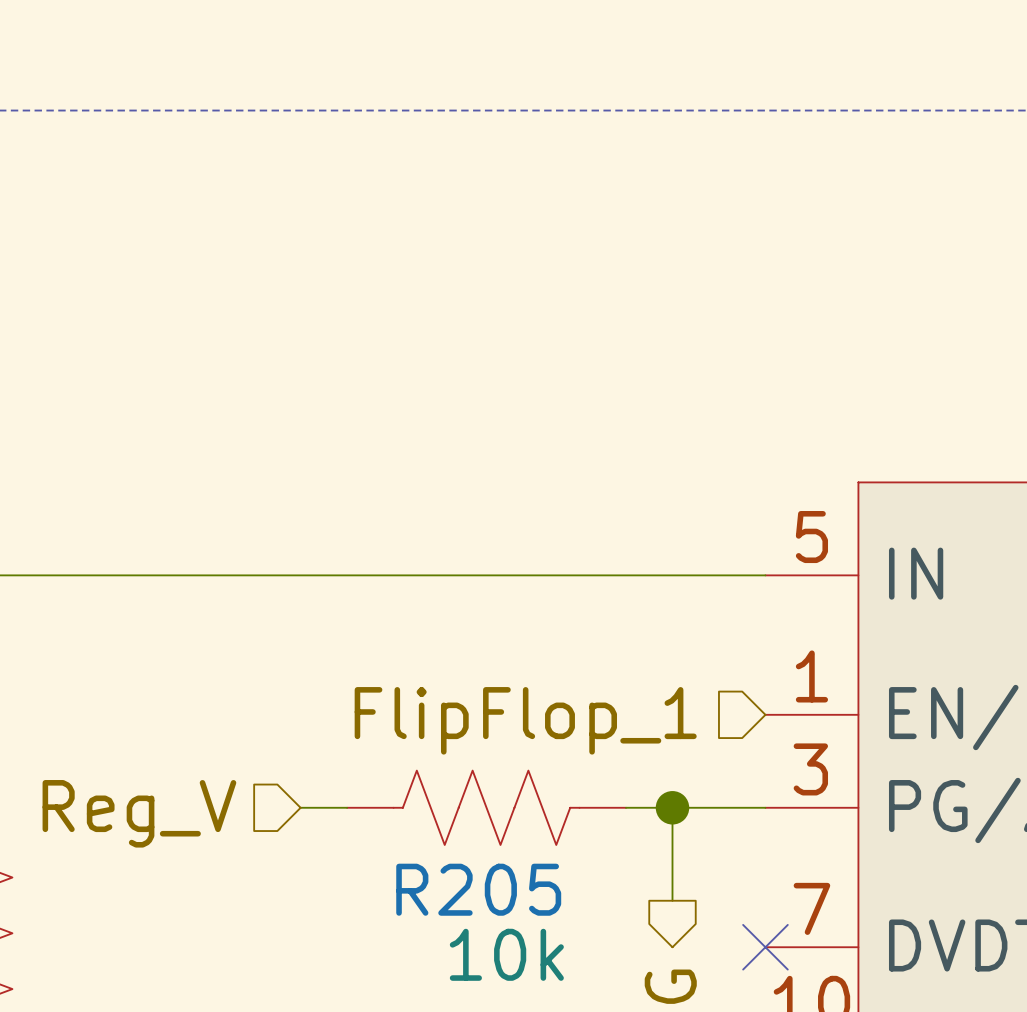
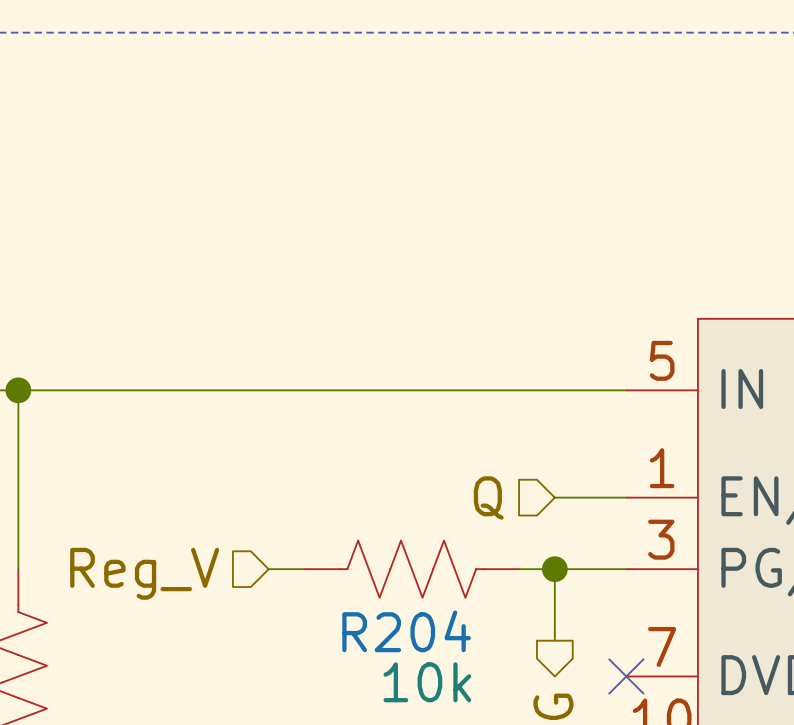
wire: none -> (554, 497) (626, 497)
hierarchical label: none -> Q (488, 498)
hierarchical label: FlipFlop_1 (525, 720) -> none
R205 name: R205 (478, 889) -> R204 (406, 631)

